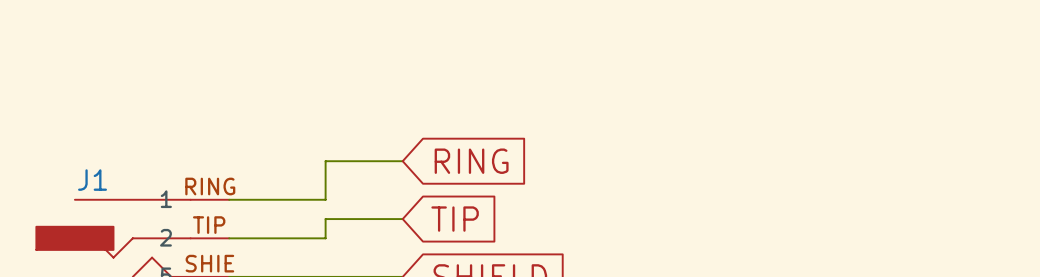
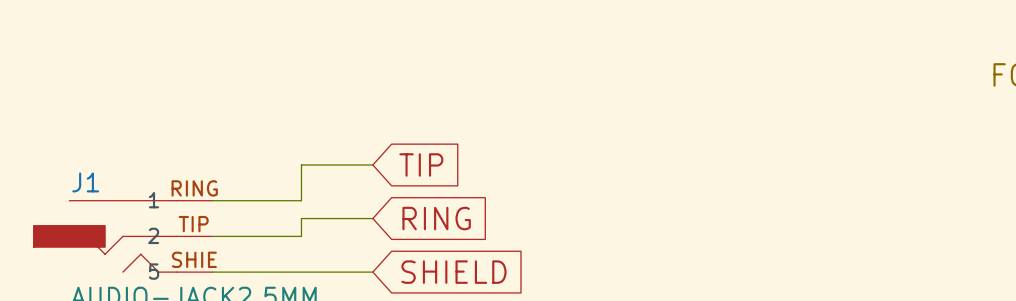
global label: RING (471, 161) -> TIP (421, 164)
global label: TIP (455, 219) -> RING (436, 218)

